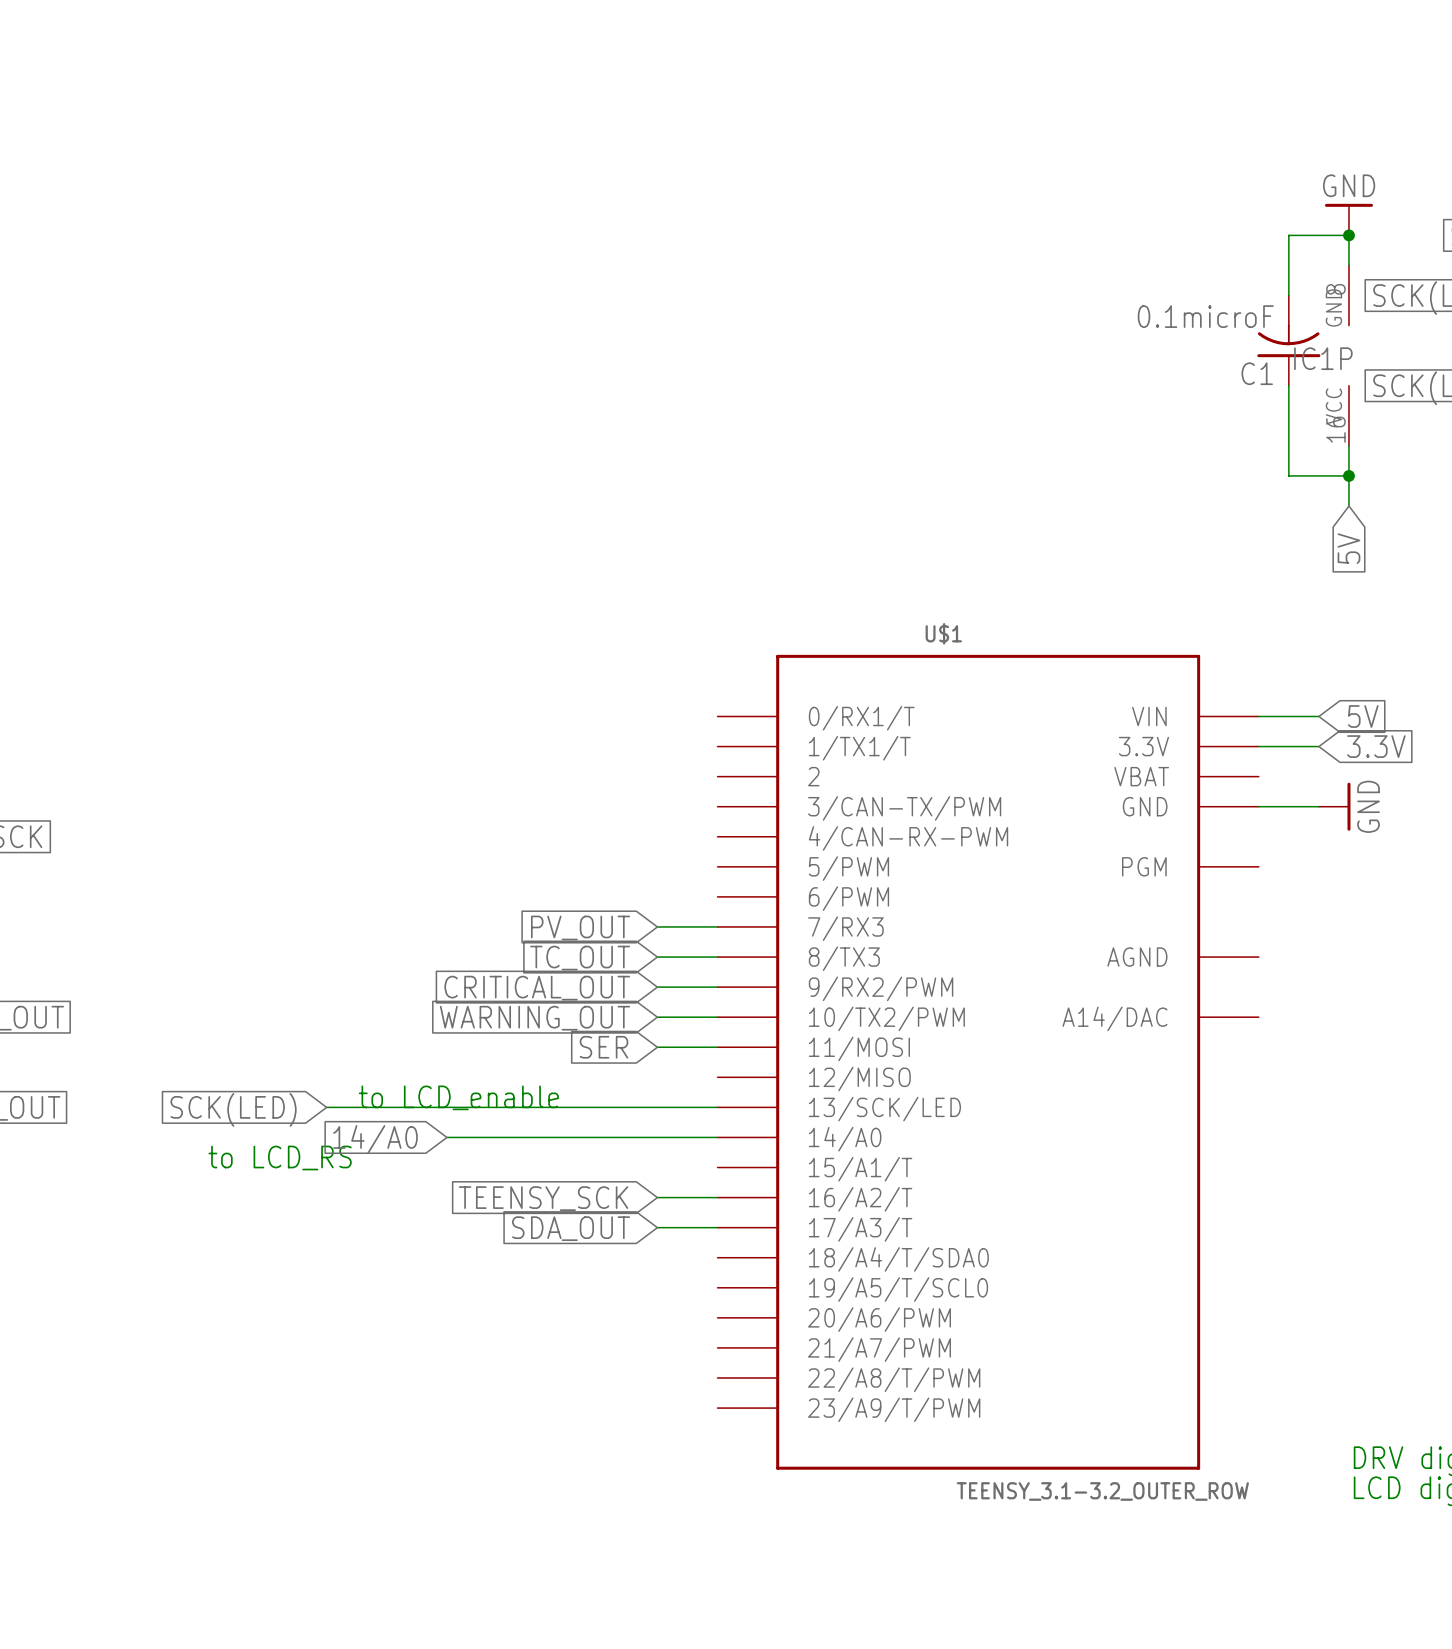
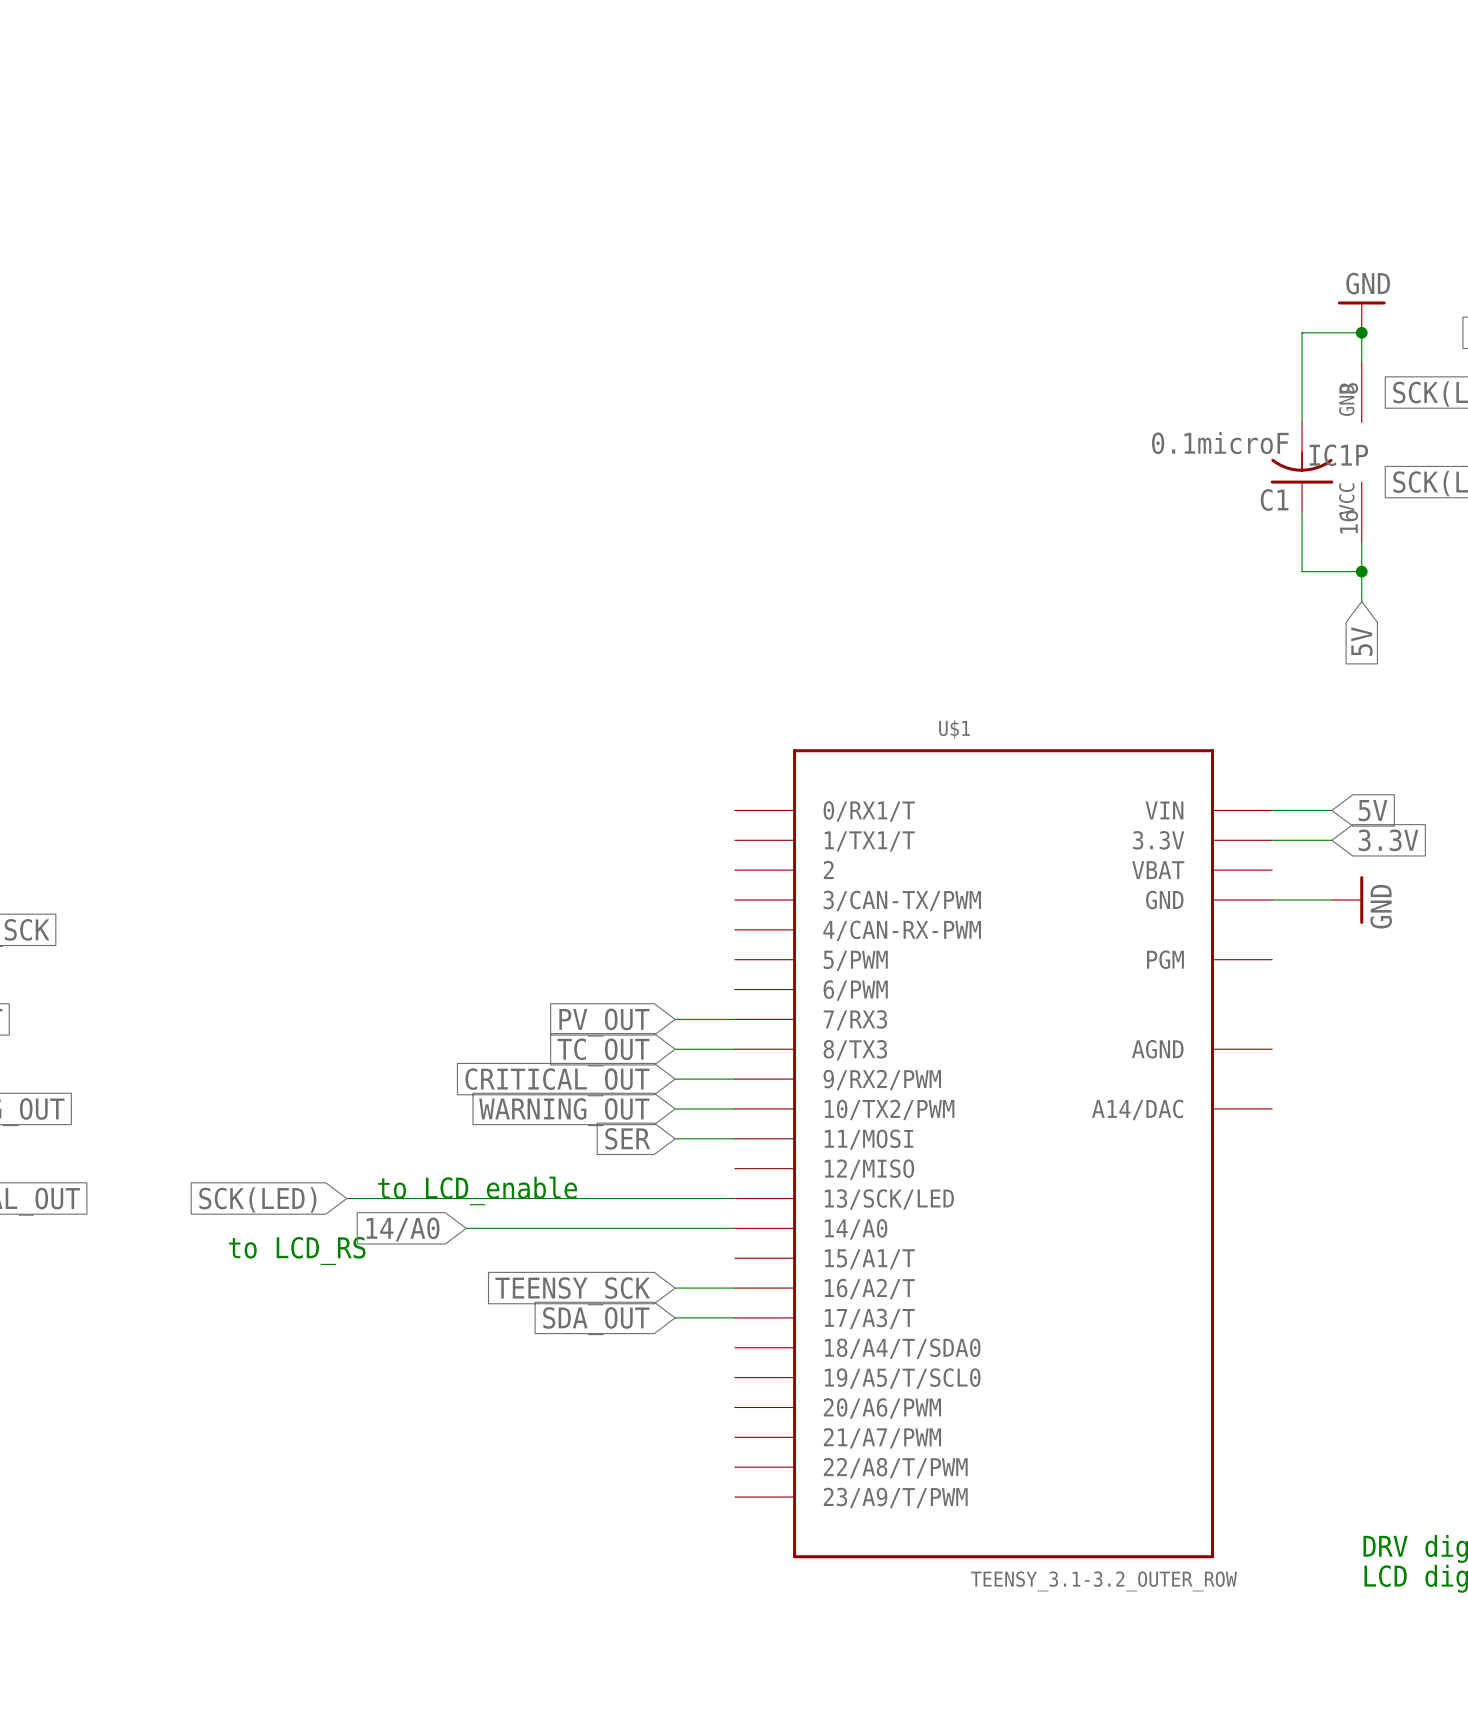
C1 position: (1288, 340) -> (1302, 467)

